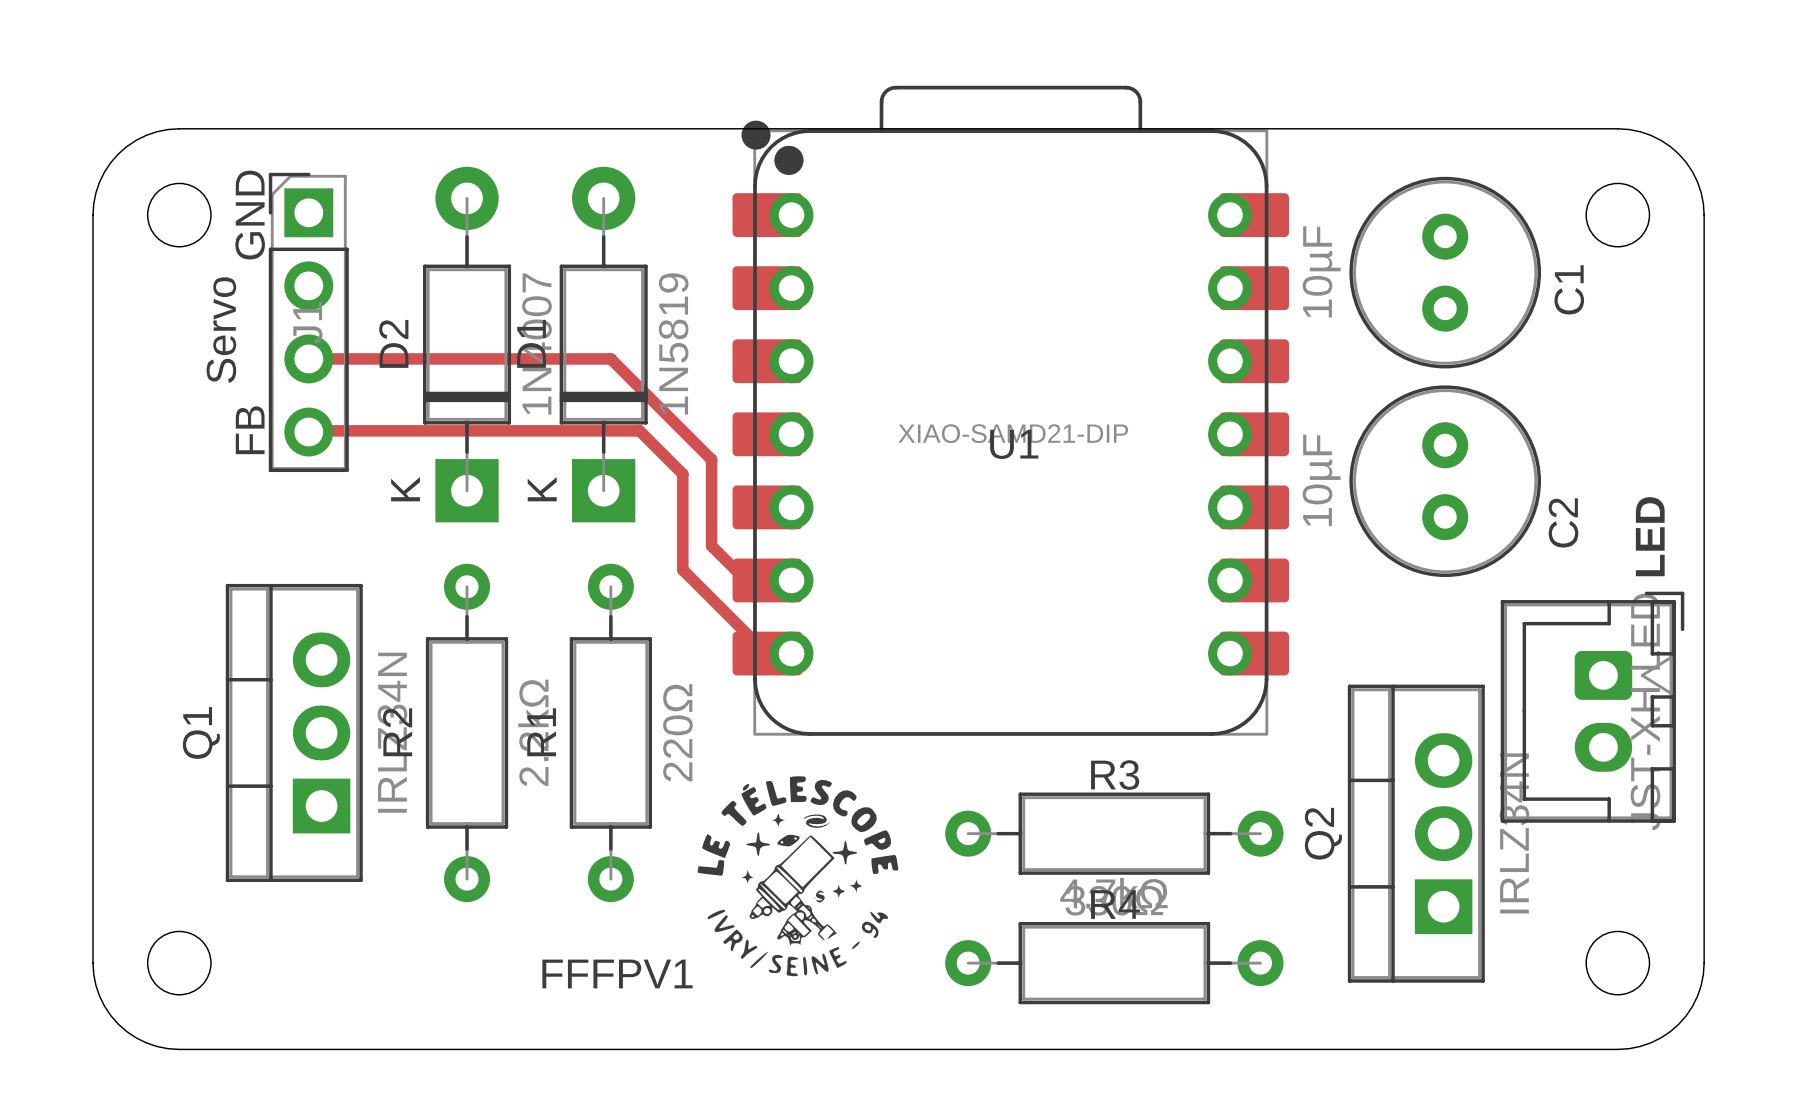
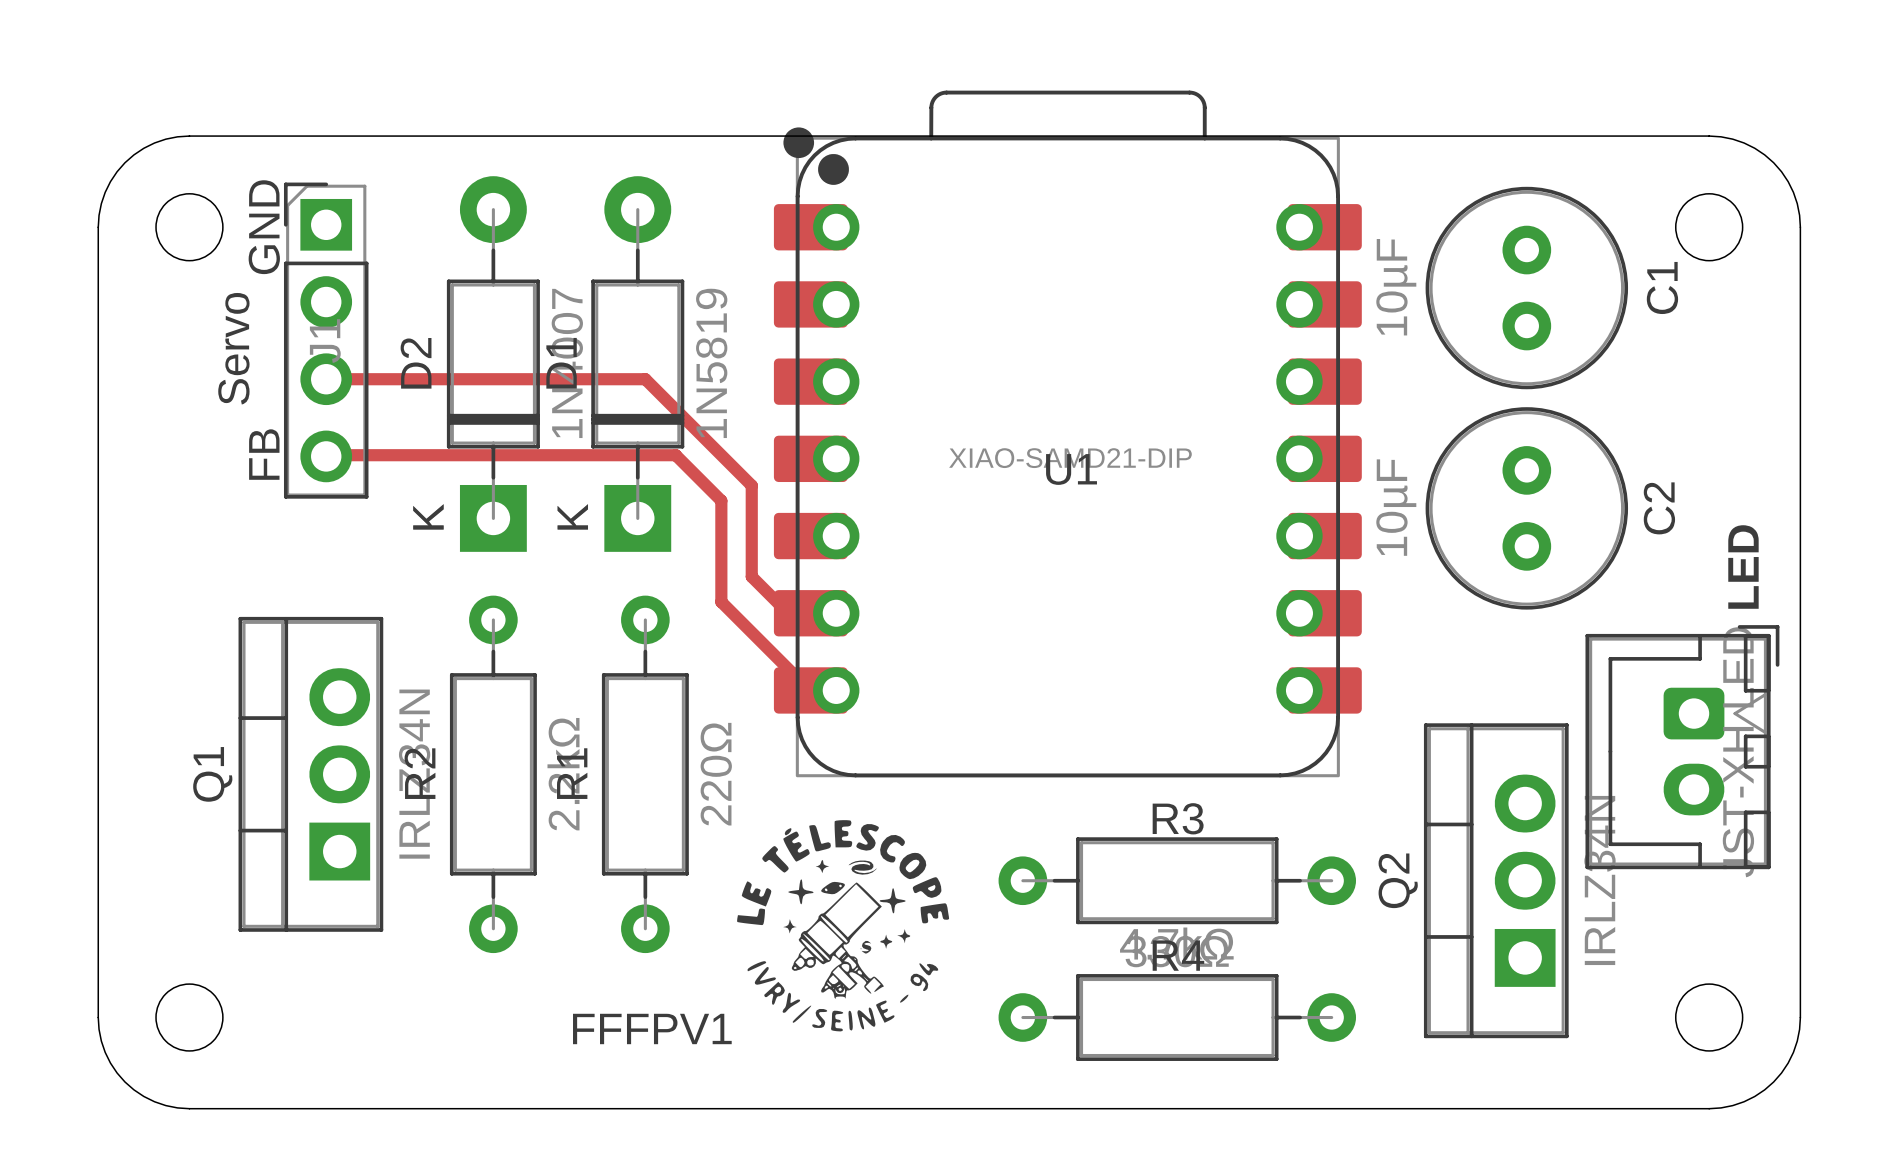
C1 name position: C1 (1569, 289) -> C1 (1662, 287)
C2 name position: C2 (1563, 522) -> C2 (1659, 508)

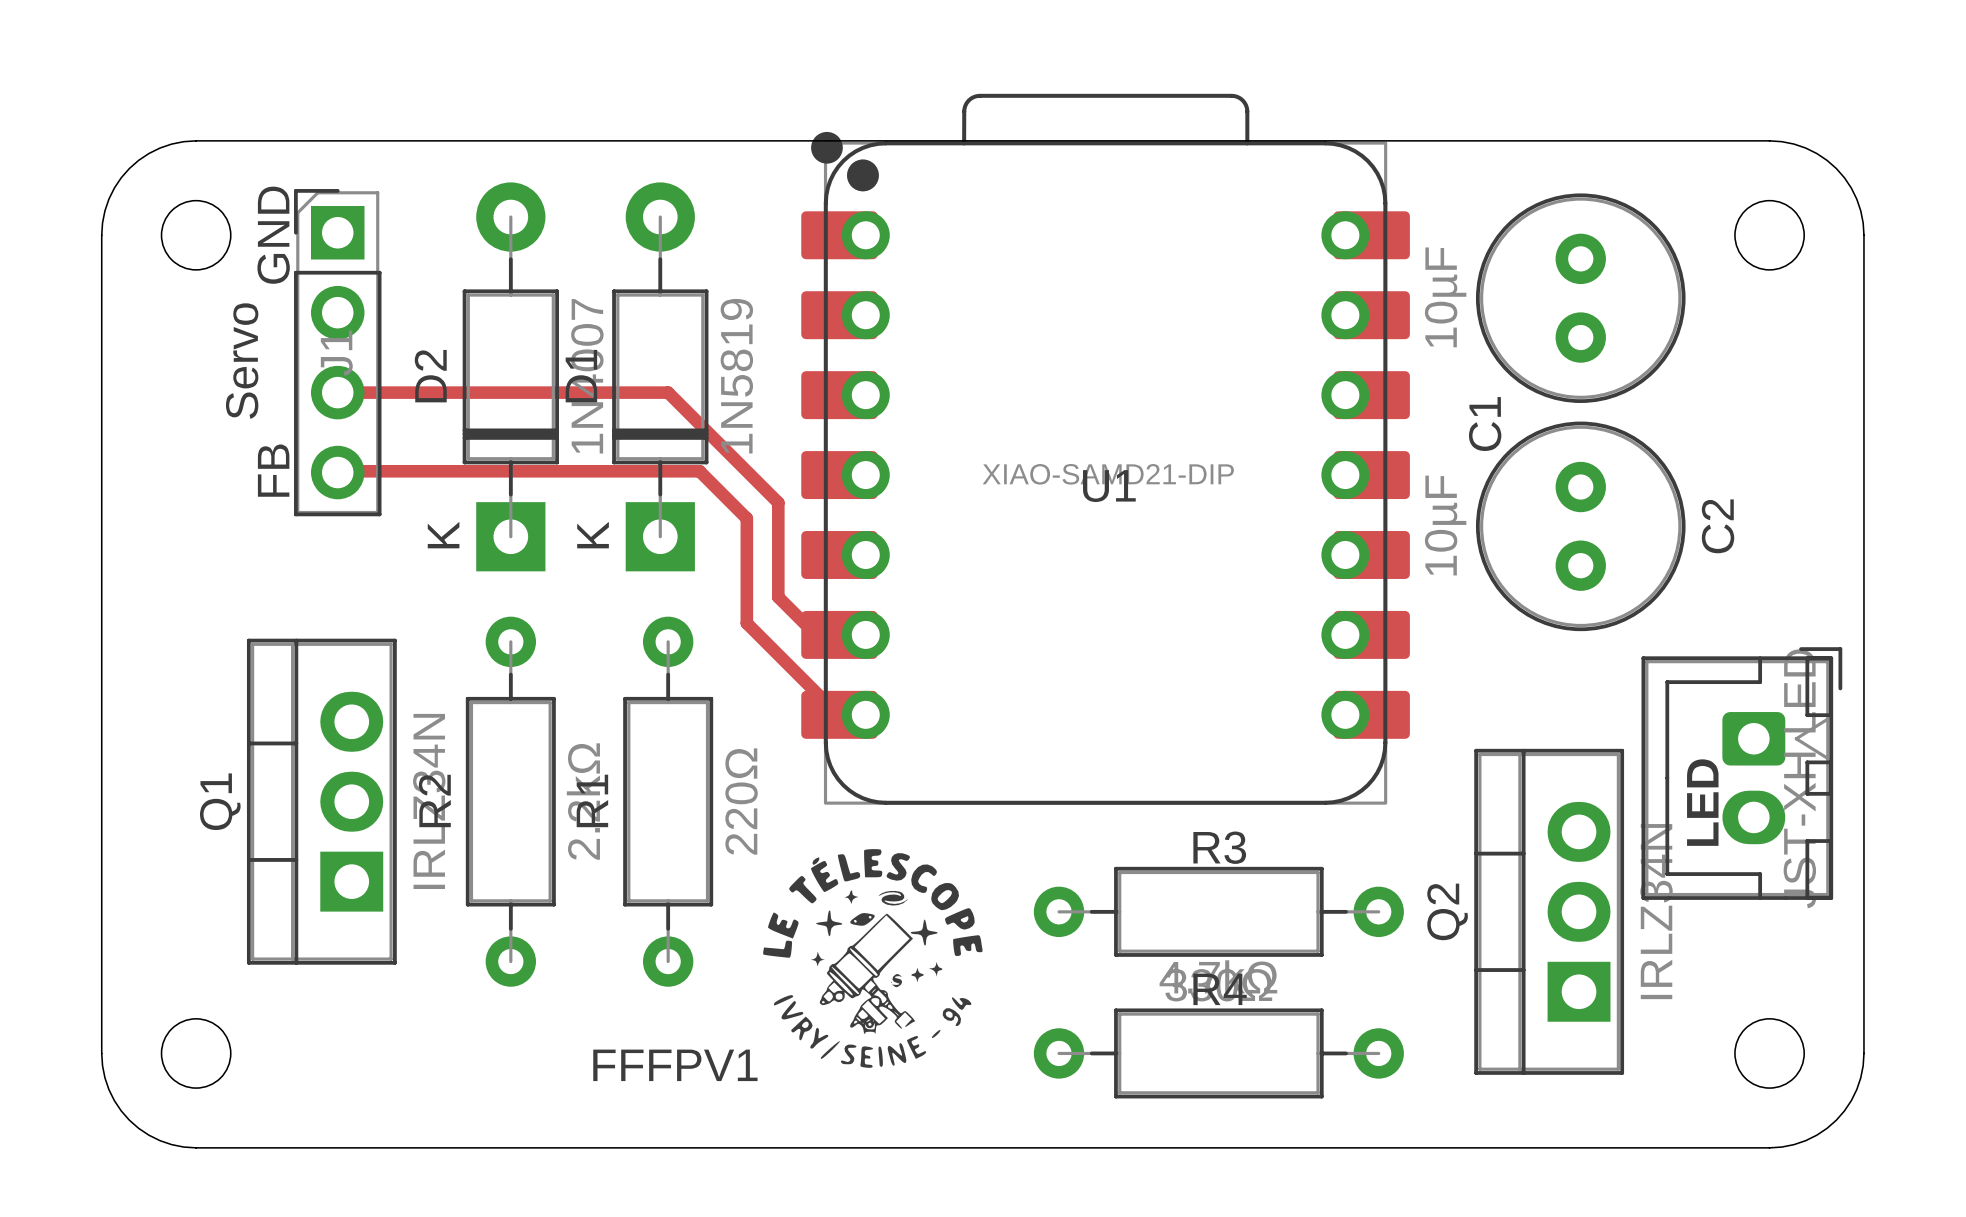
C1 name position: C1 (1662, 287) -> C1 (1485, 424)
text position: LED (1743, 567) -> LED (1702, 802)

